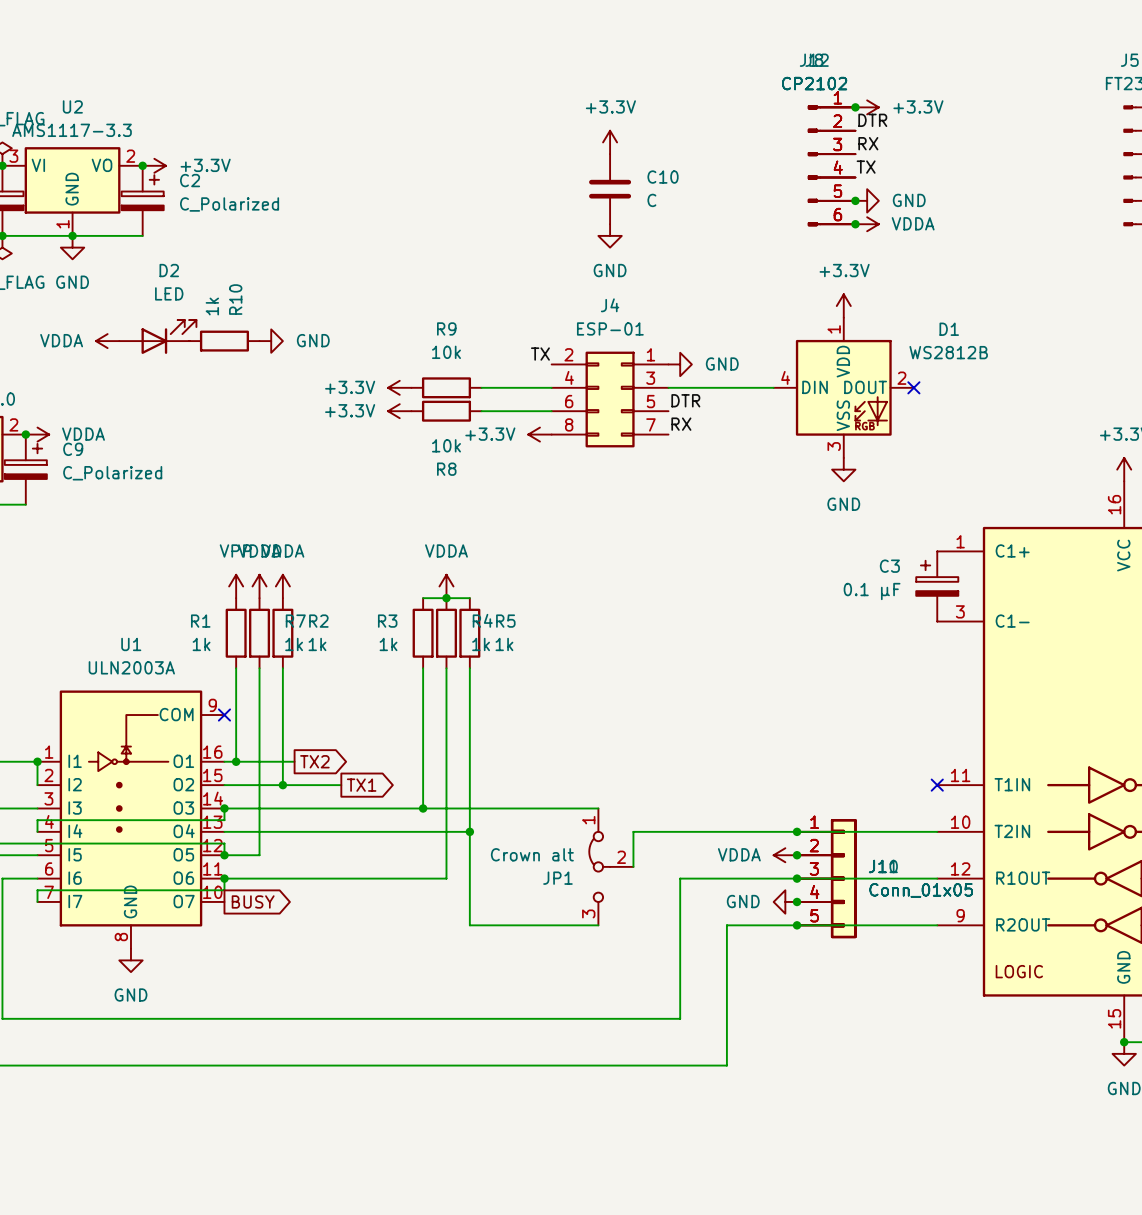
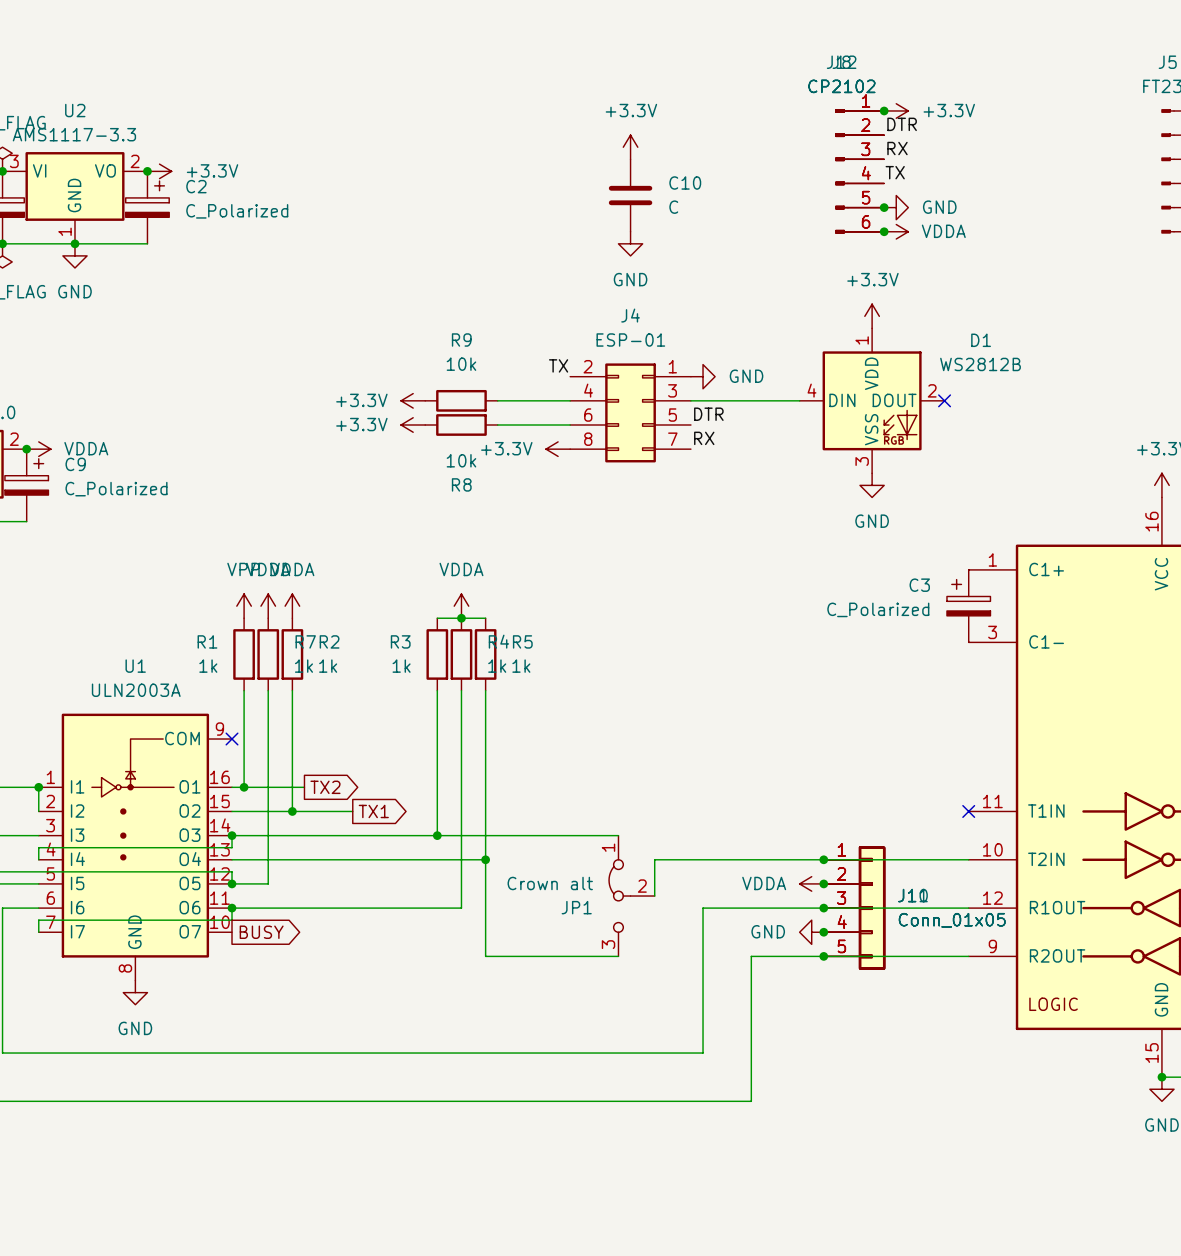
D2: LED (157, 336) -> none
power symbol: VDDA (107, 341) -> none
R10: 1k (224, 341) -> none
power symbol: GND (271, 341) -> none
C3 value: 0.1 μF (872, 591) -> C_Polarized (878, 609)

